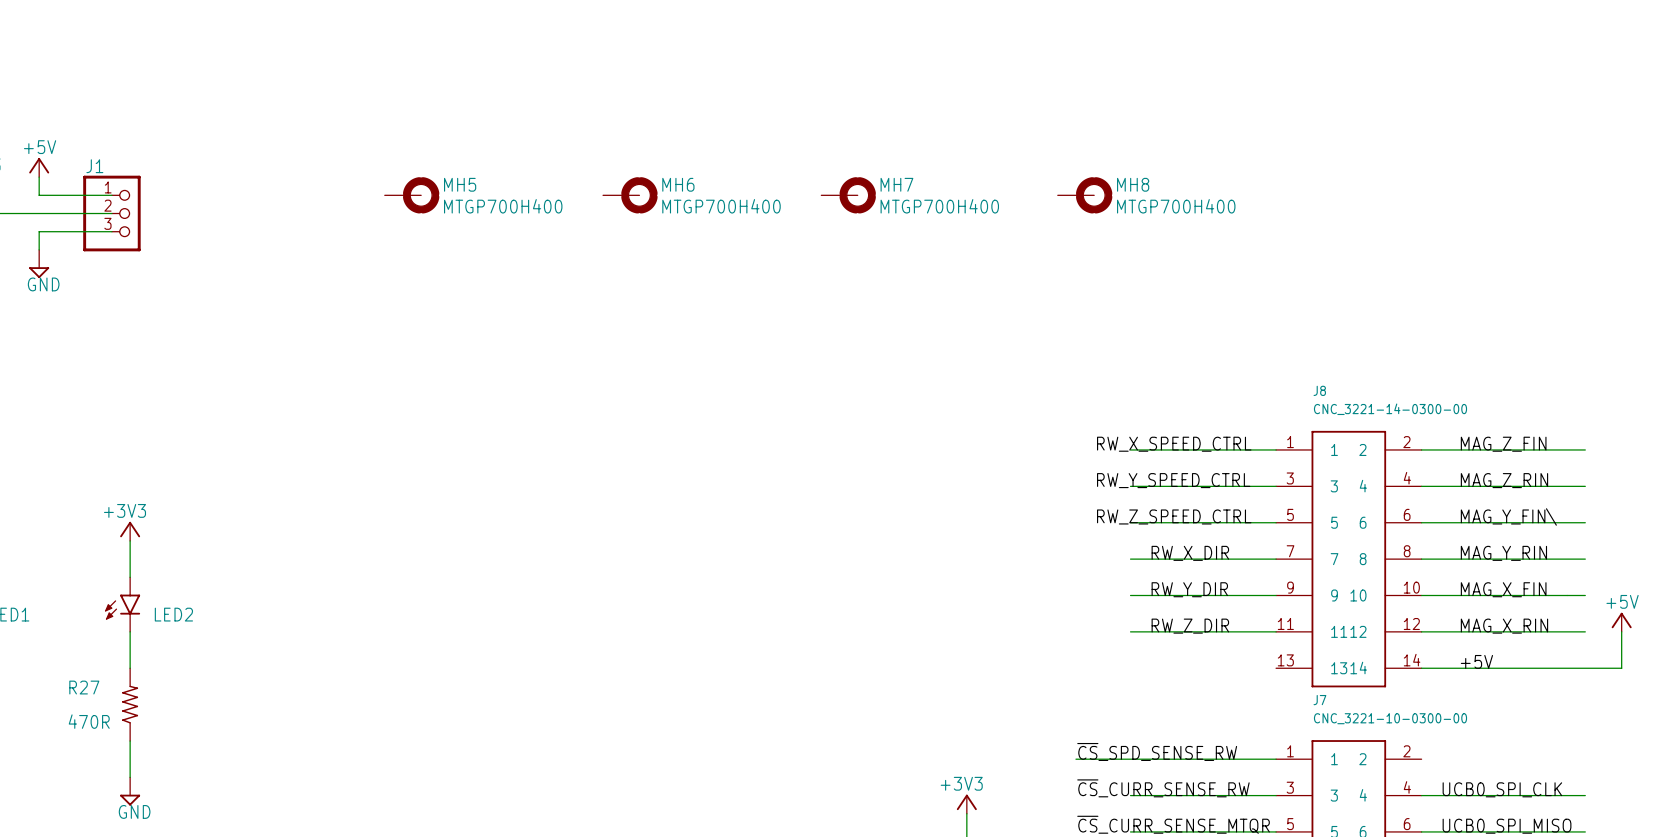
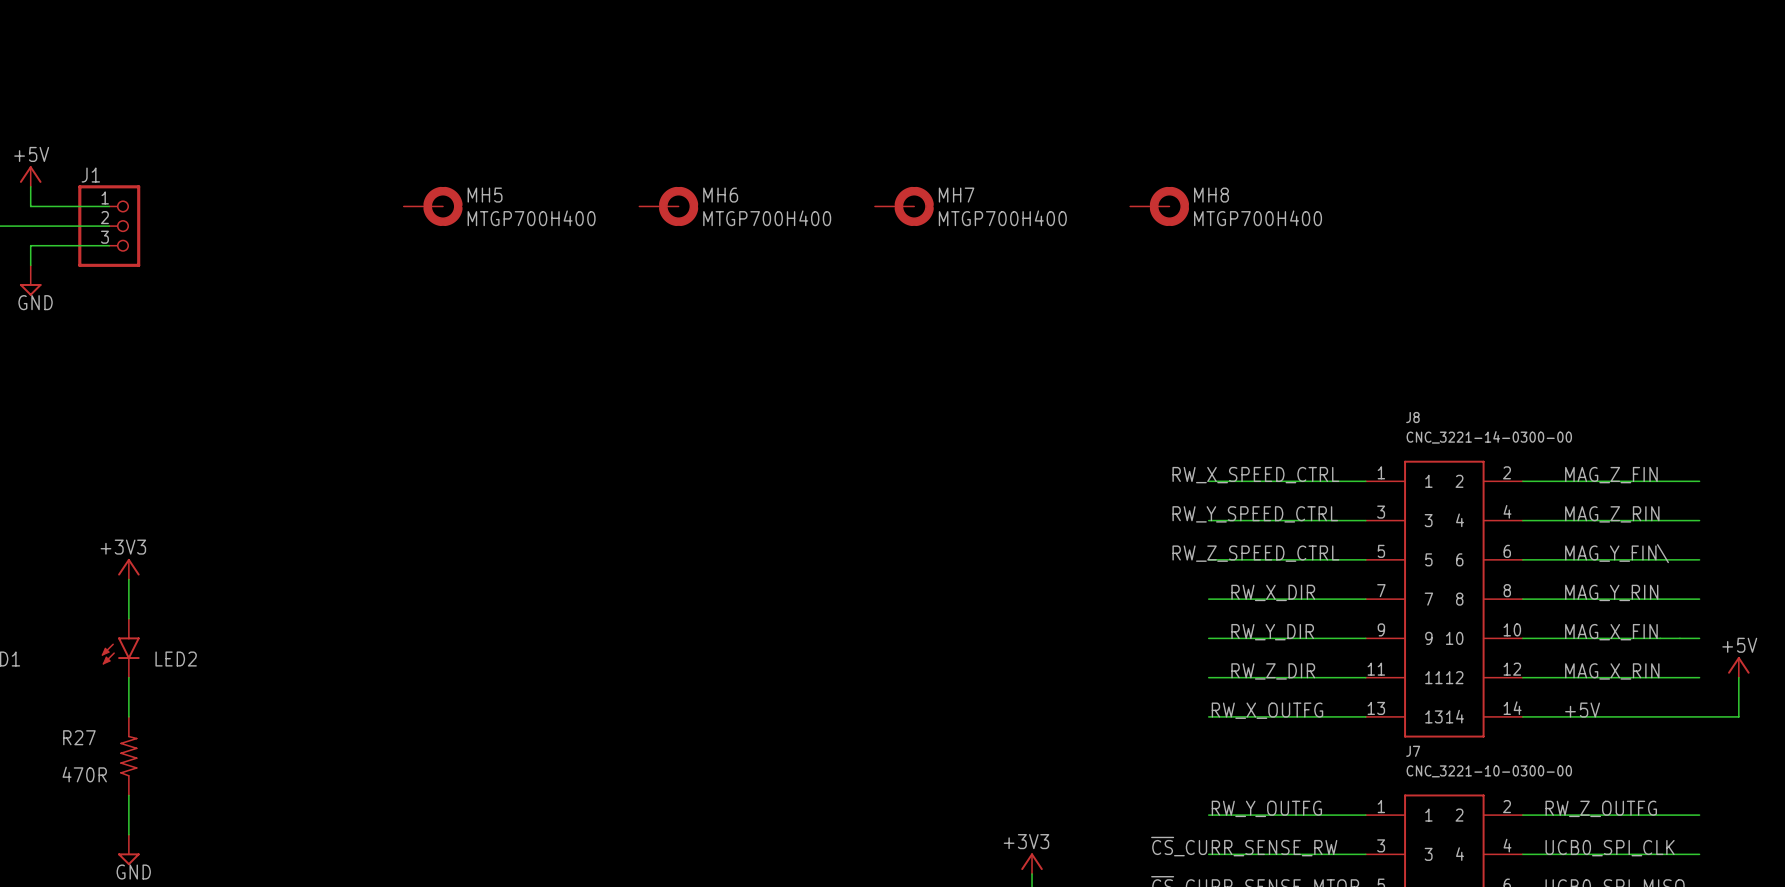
label: none -> RW_X_OUTFG (1267, 710)
wire: none -> (1208, 716) (1365, 716)
label: ~{CS}_SPD_SENSE_RW (1157, 751) -> none
label: none -> RW_Y_OUTFG (1266, 808)
label: none -> RW_Z_OUTFG (1601, 808)
wire: (1075, 759) (1130, 759) -> none
wire: none -> (1522, 815) (1699, 815)

